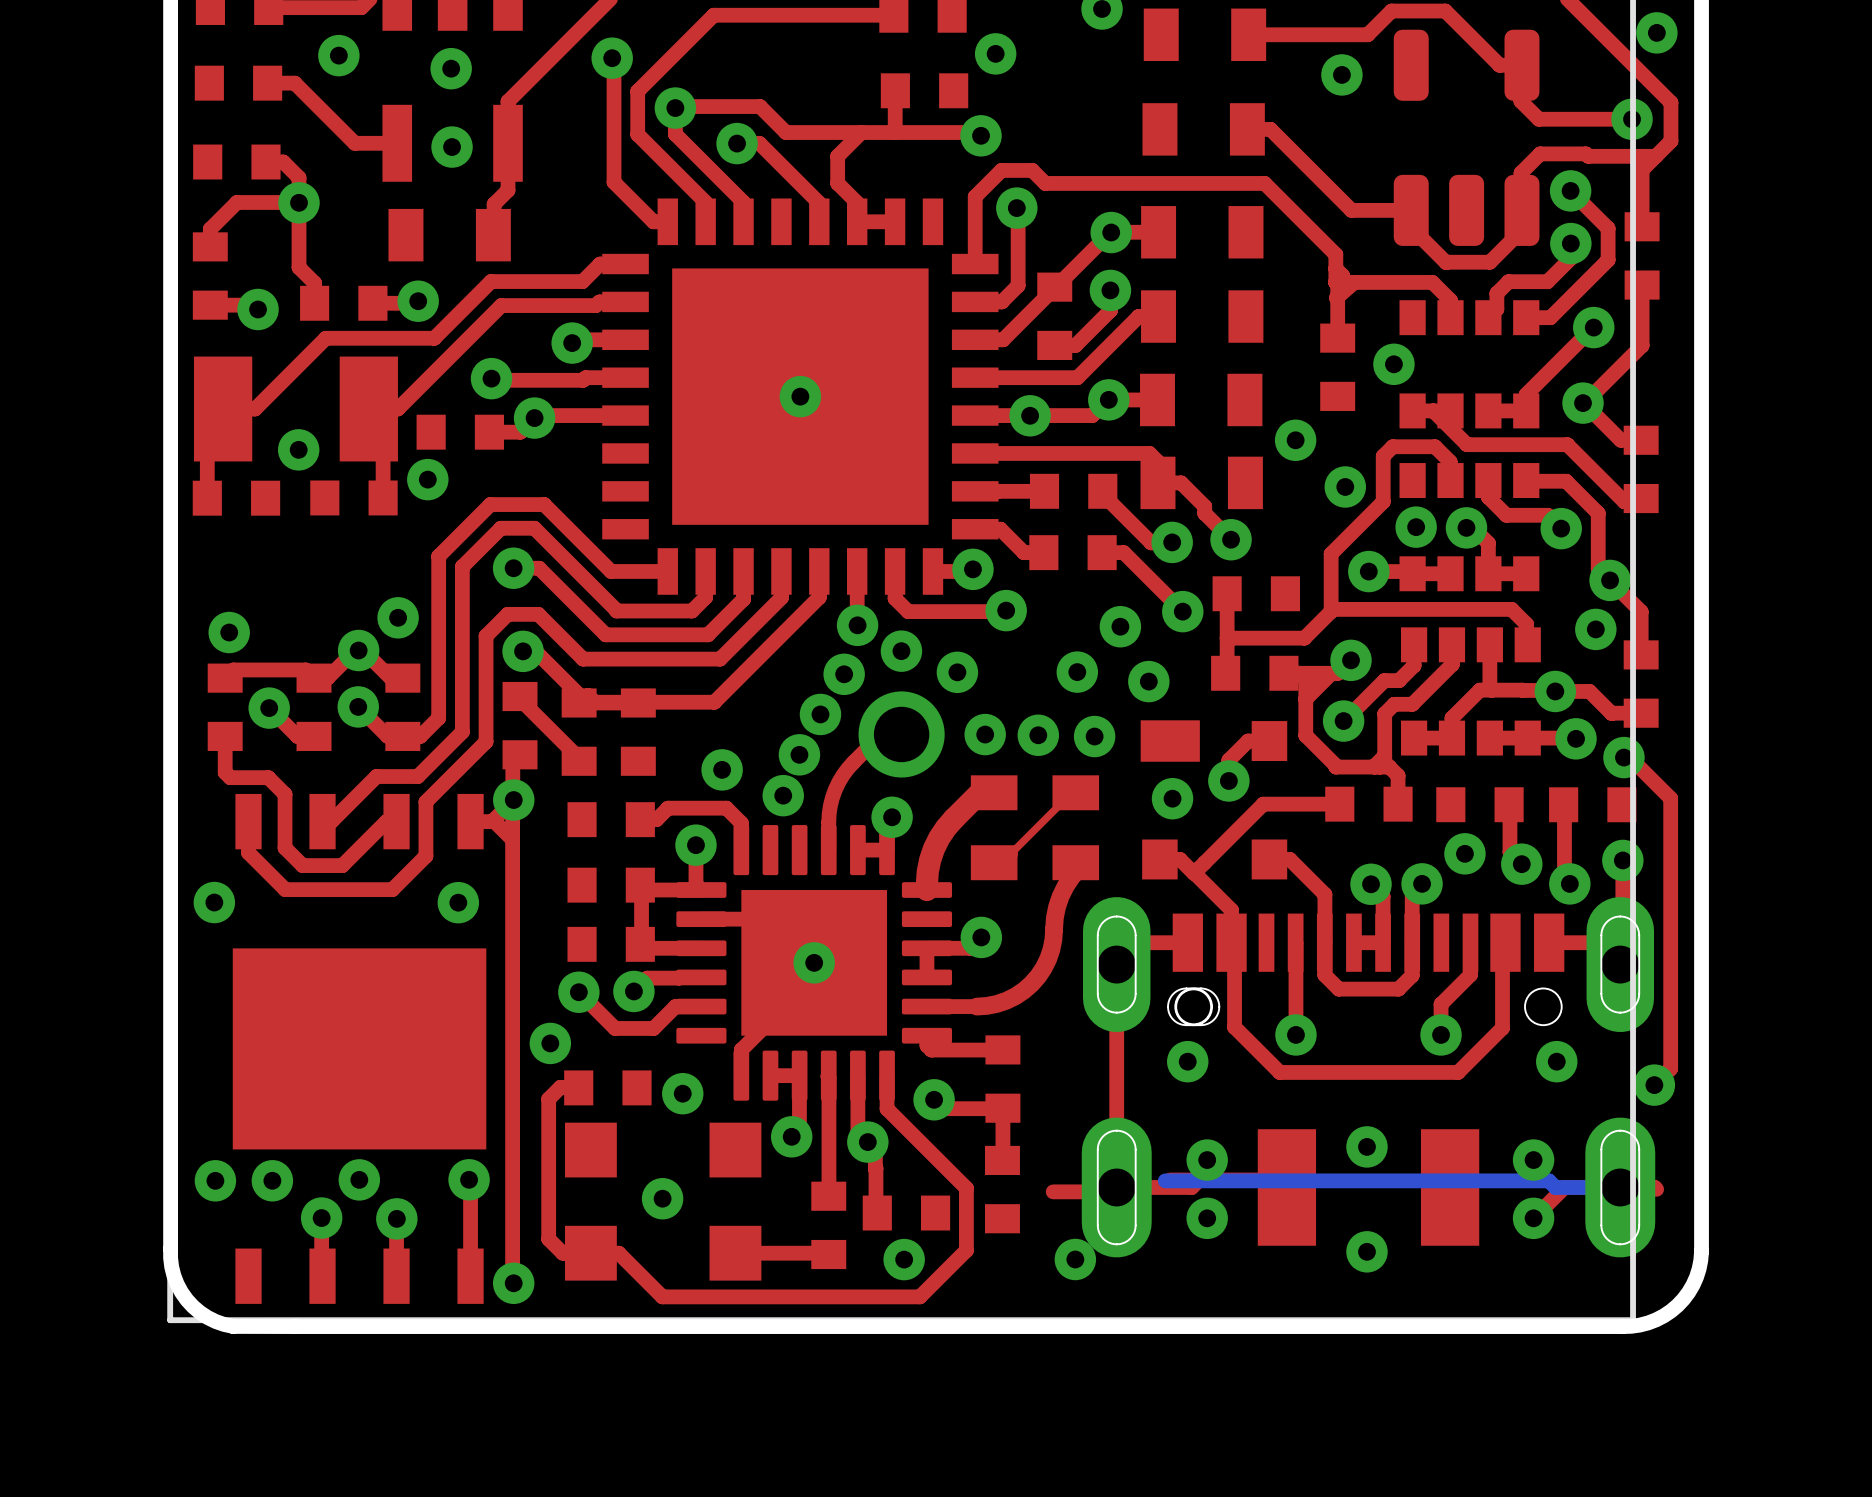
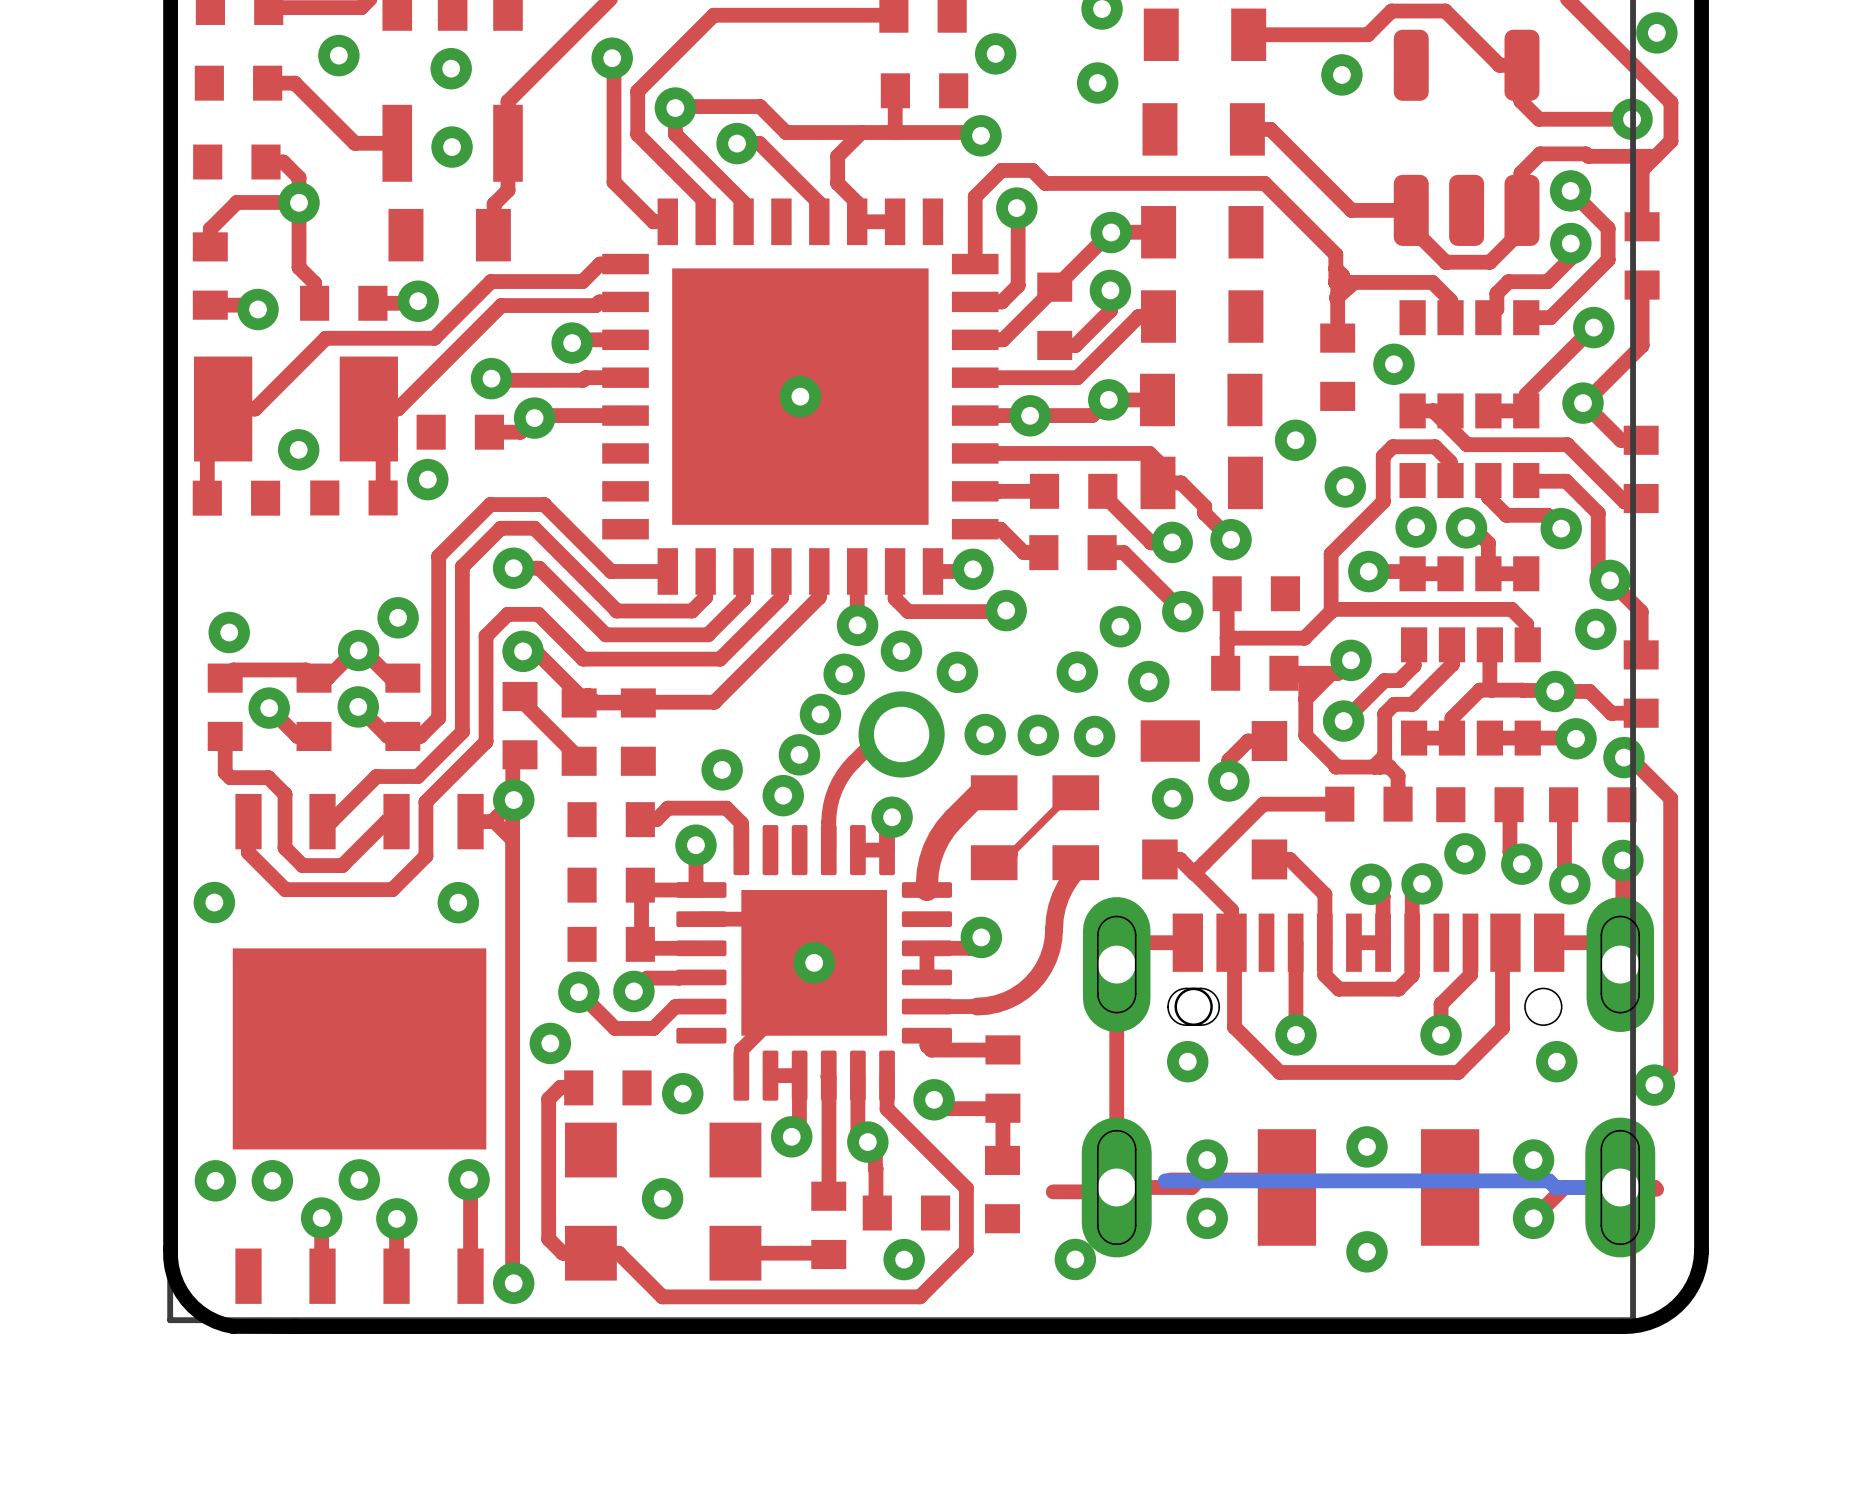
via: none -> (1097, 83)

